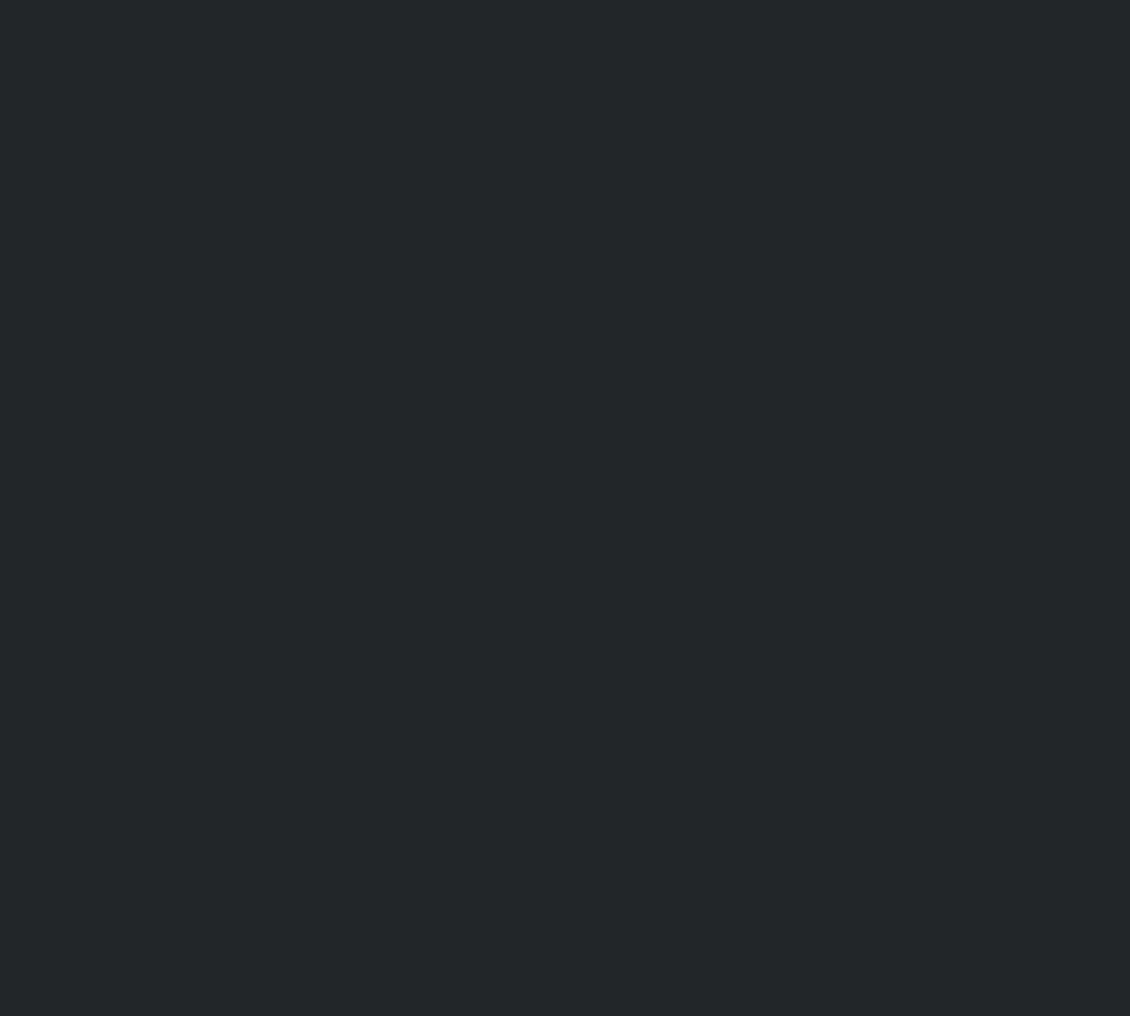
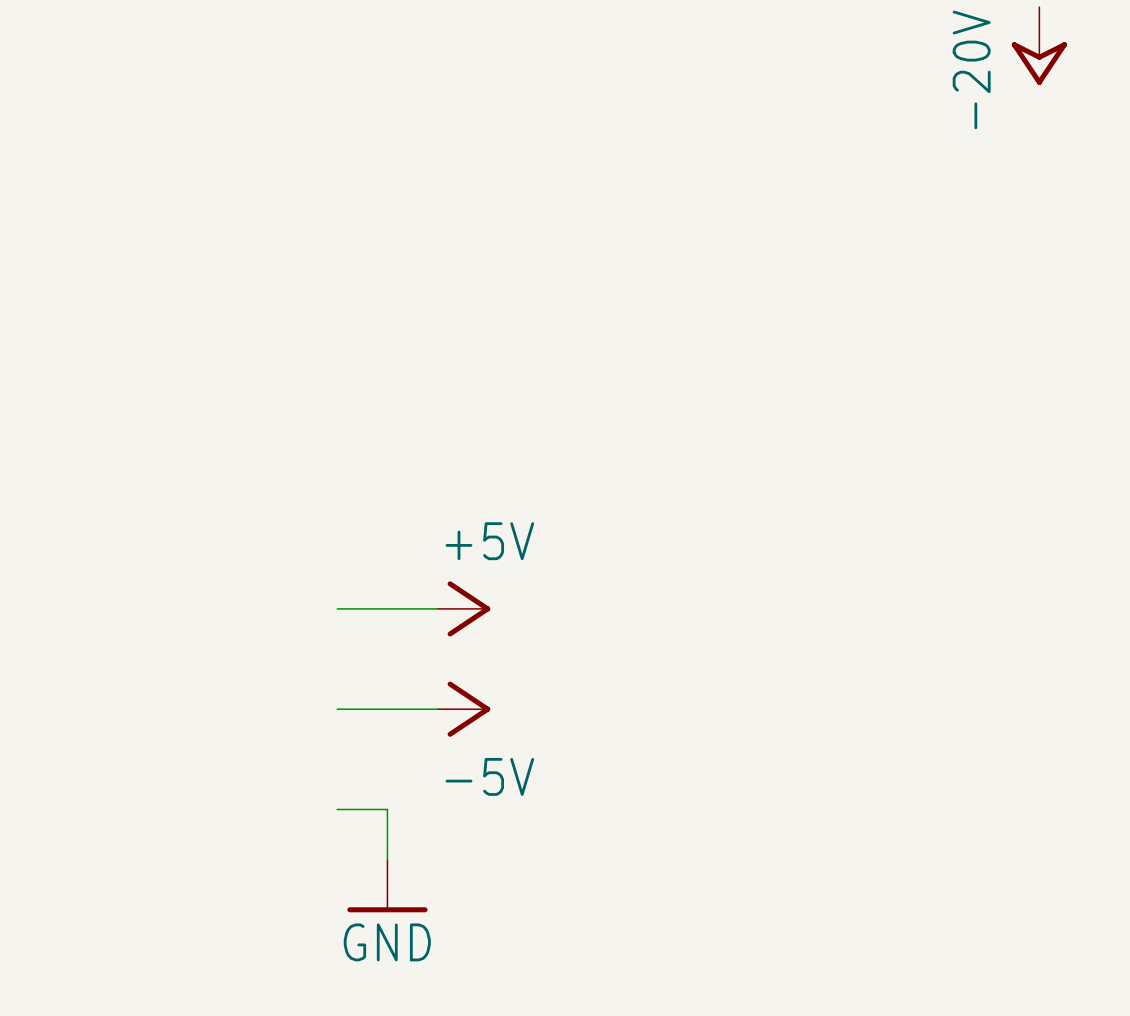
power symbol: none -> -20V (1039, 45)
wire: none -> (337, 608) (437, 608)
power symbol: none -> +5V (463, 608)
wire: none -> (337, 709) (437, 709)
power symbol: none -> -5V (463, 709)
wire: none -> (337, 809) (387, 809) (387, 859)
power symbol: none -> GND (387, 885)

